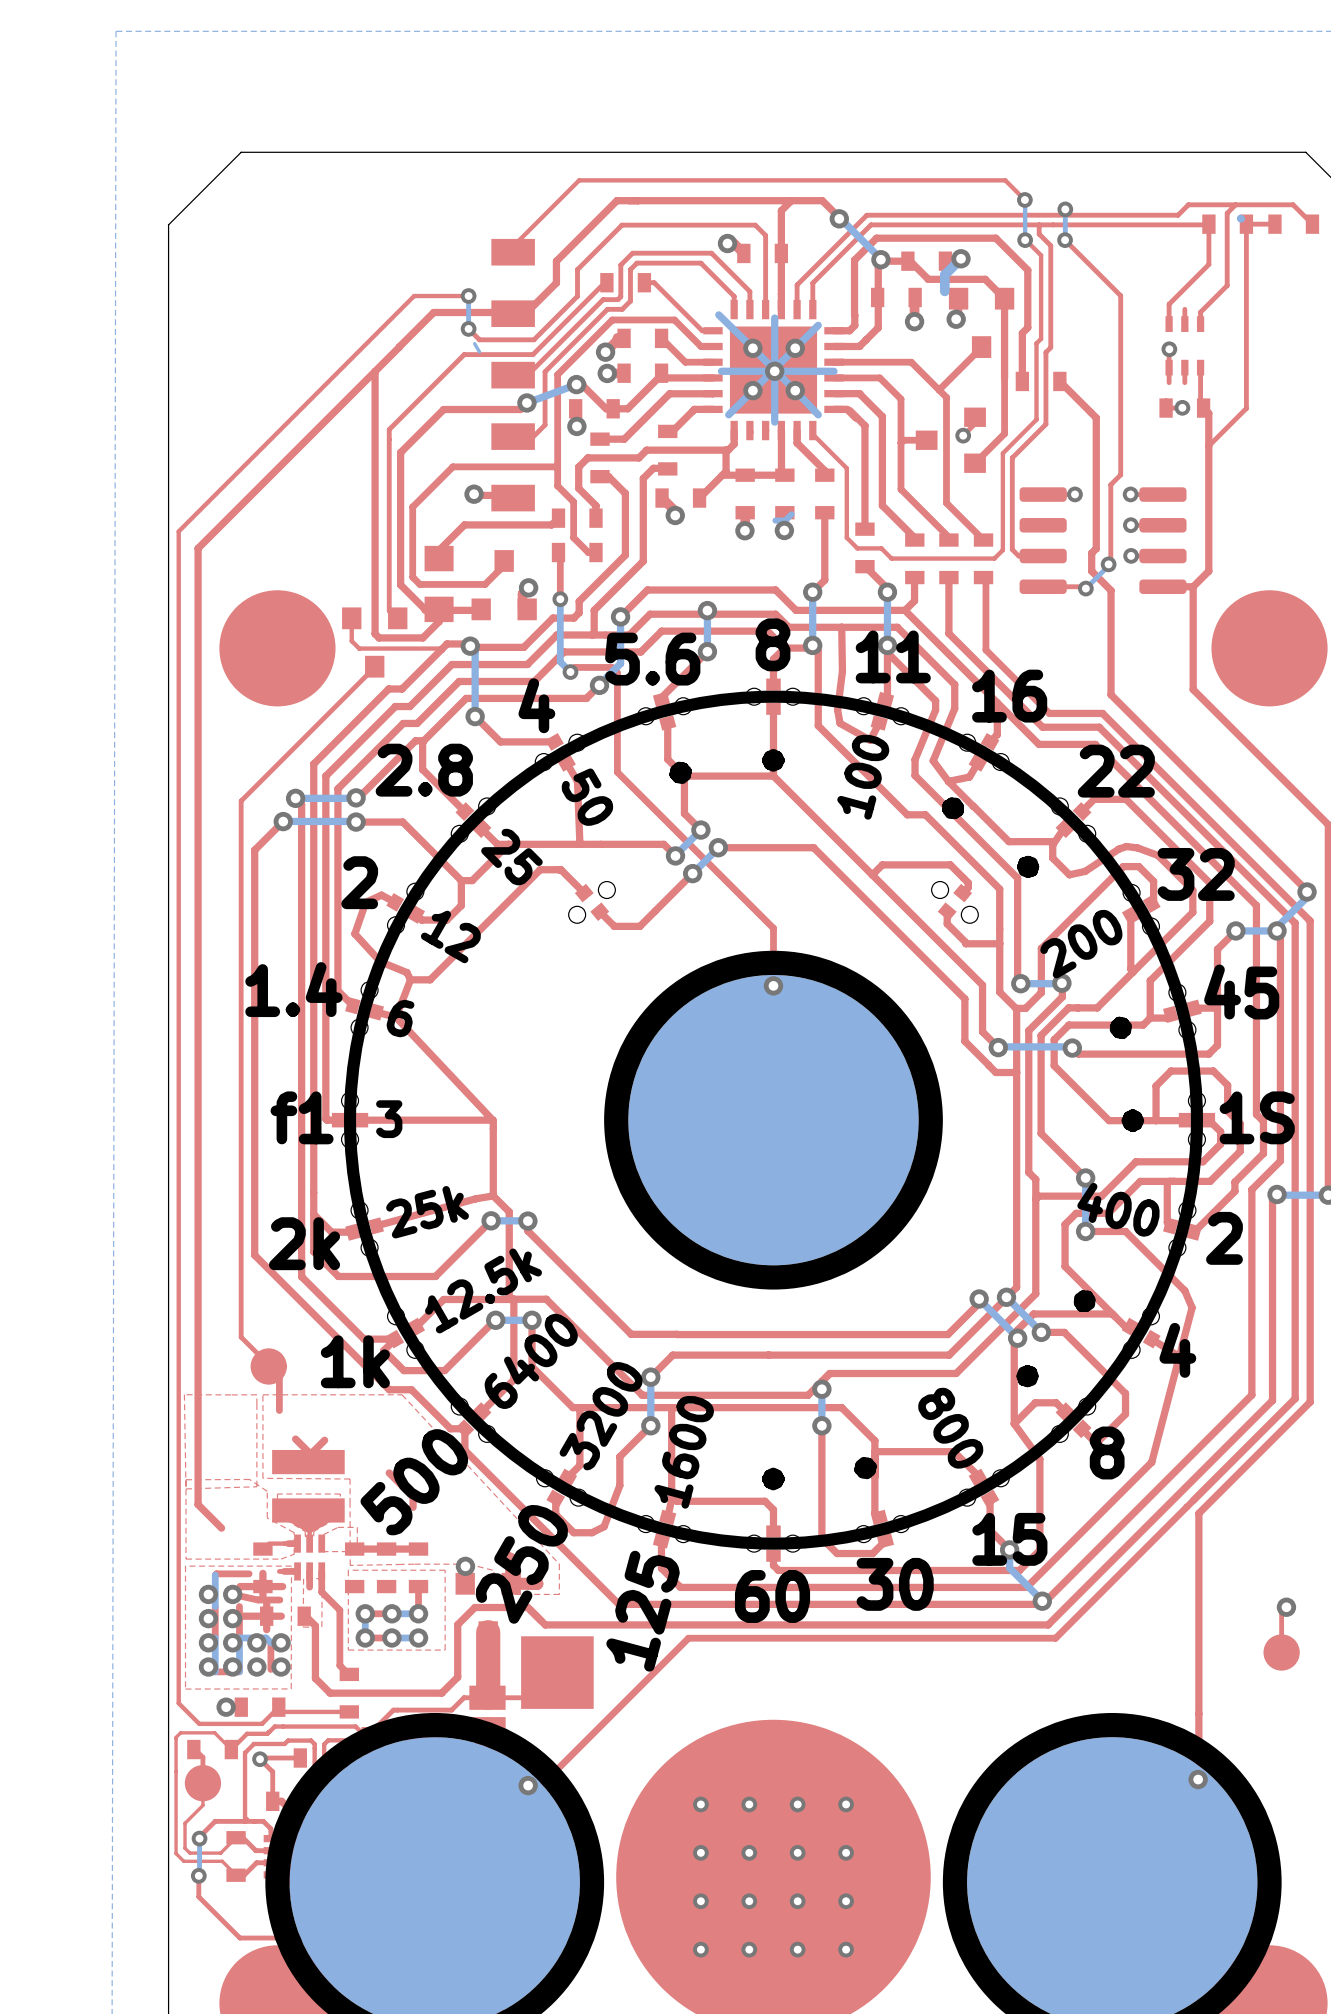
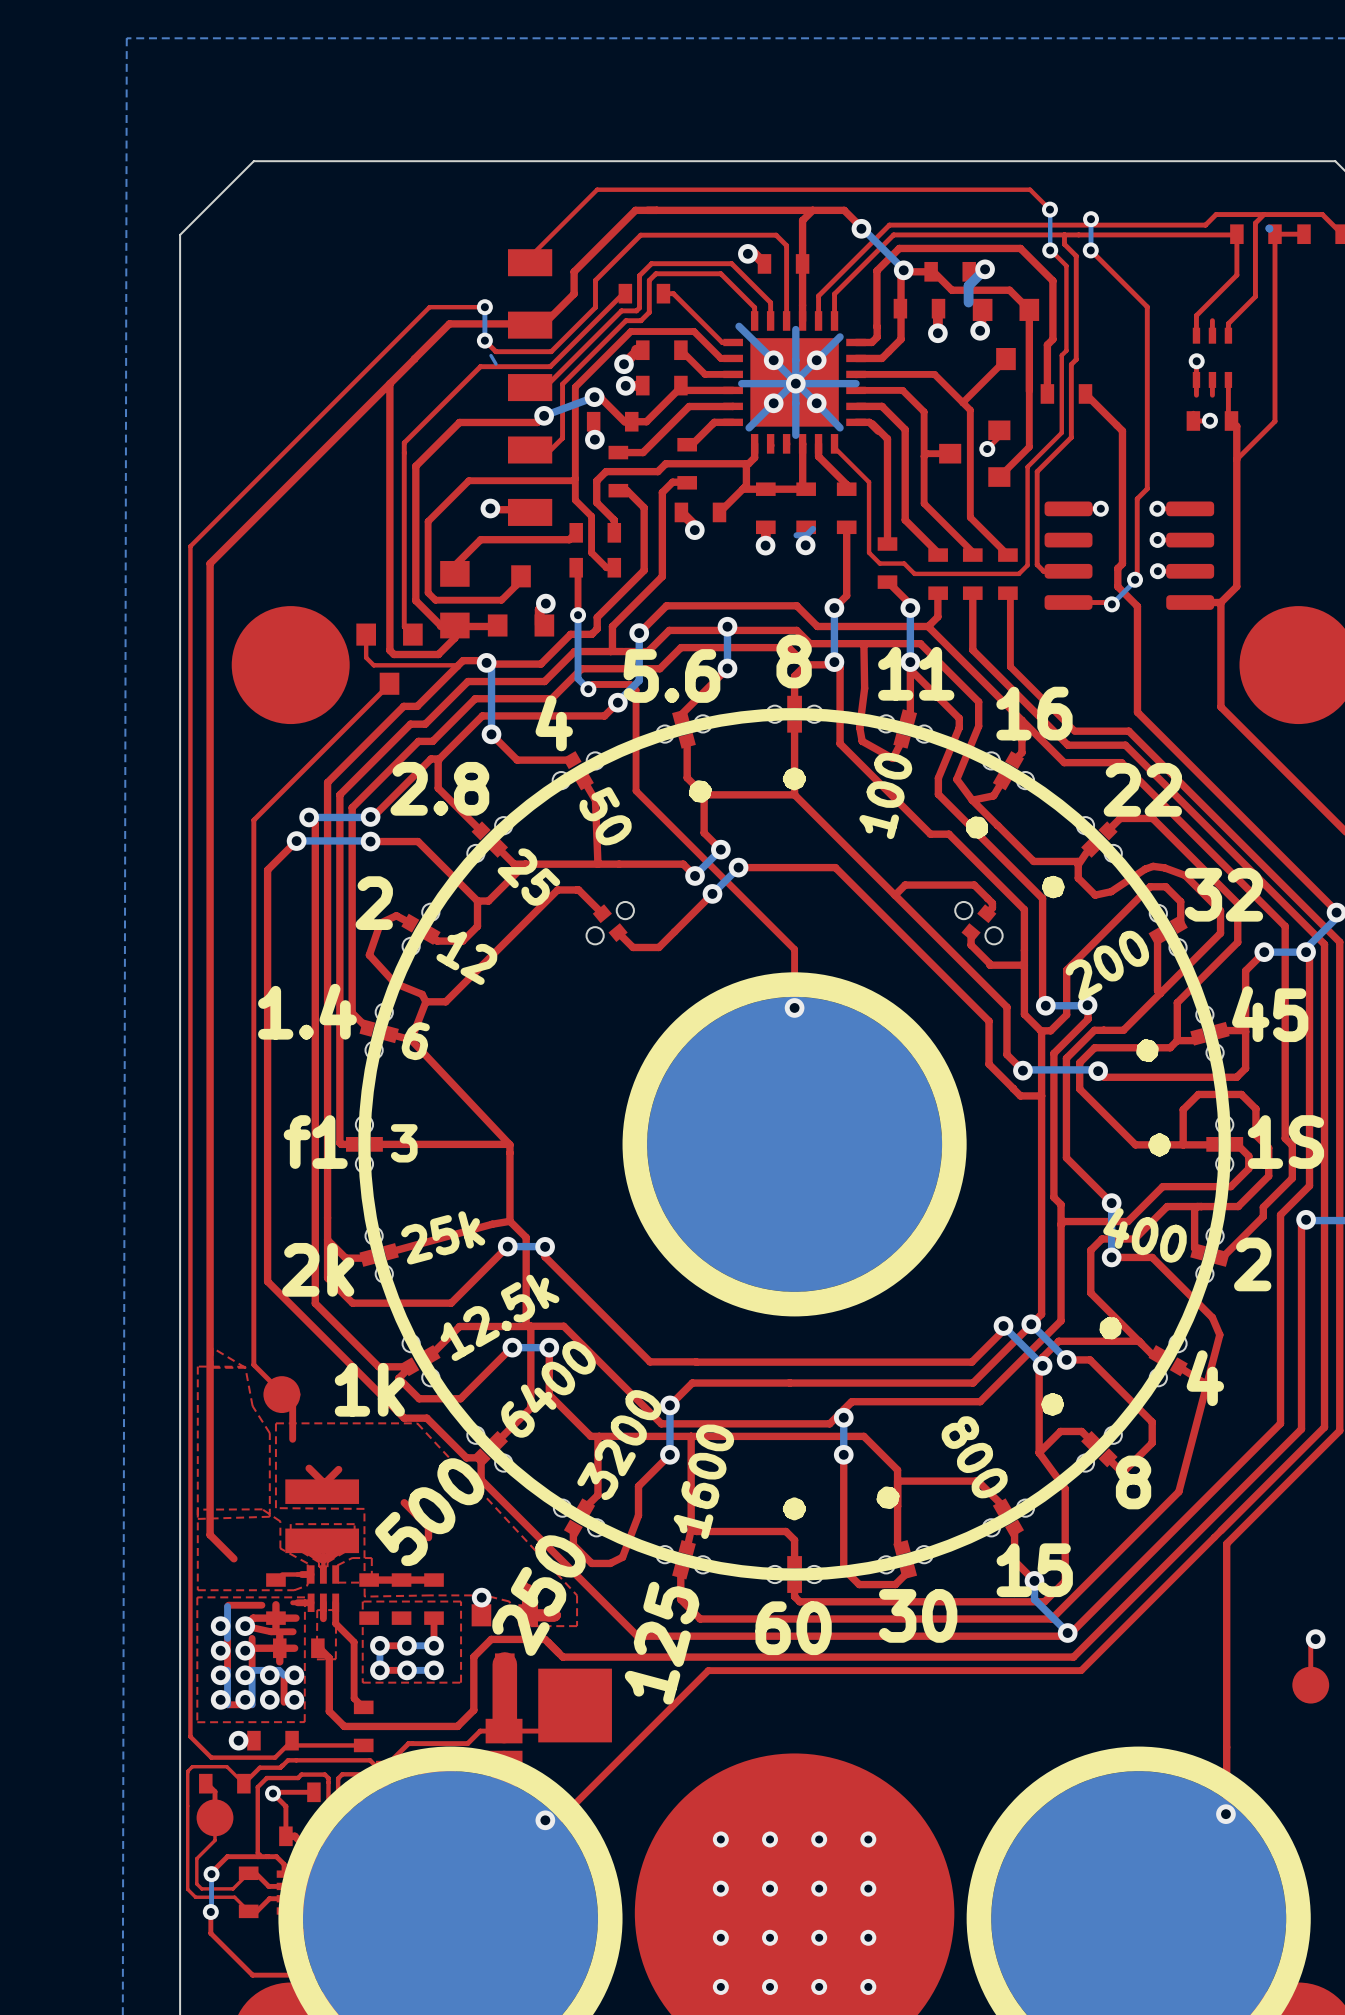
top zone outline: none -> (212, 1347) (245, 1367) (212, 1367) (212, 1347)
top zone outline: (256, 1404) (256, 1394) (184, 1394) (185, 1488) -> (269, 1433) (252, 1406) (245, 1366) (197, 1366) (197, 1509)

